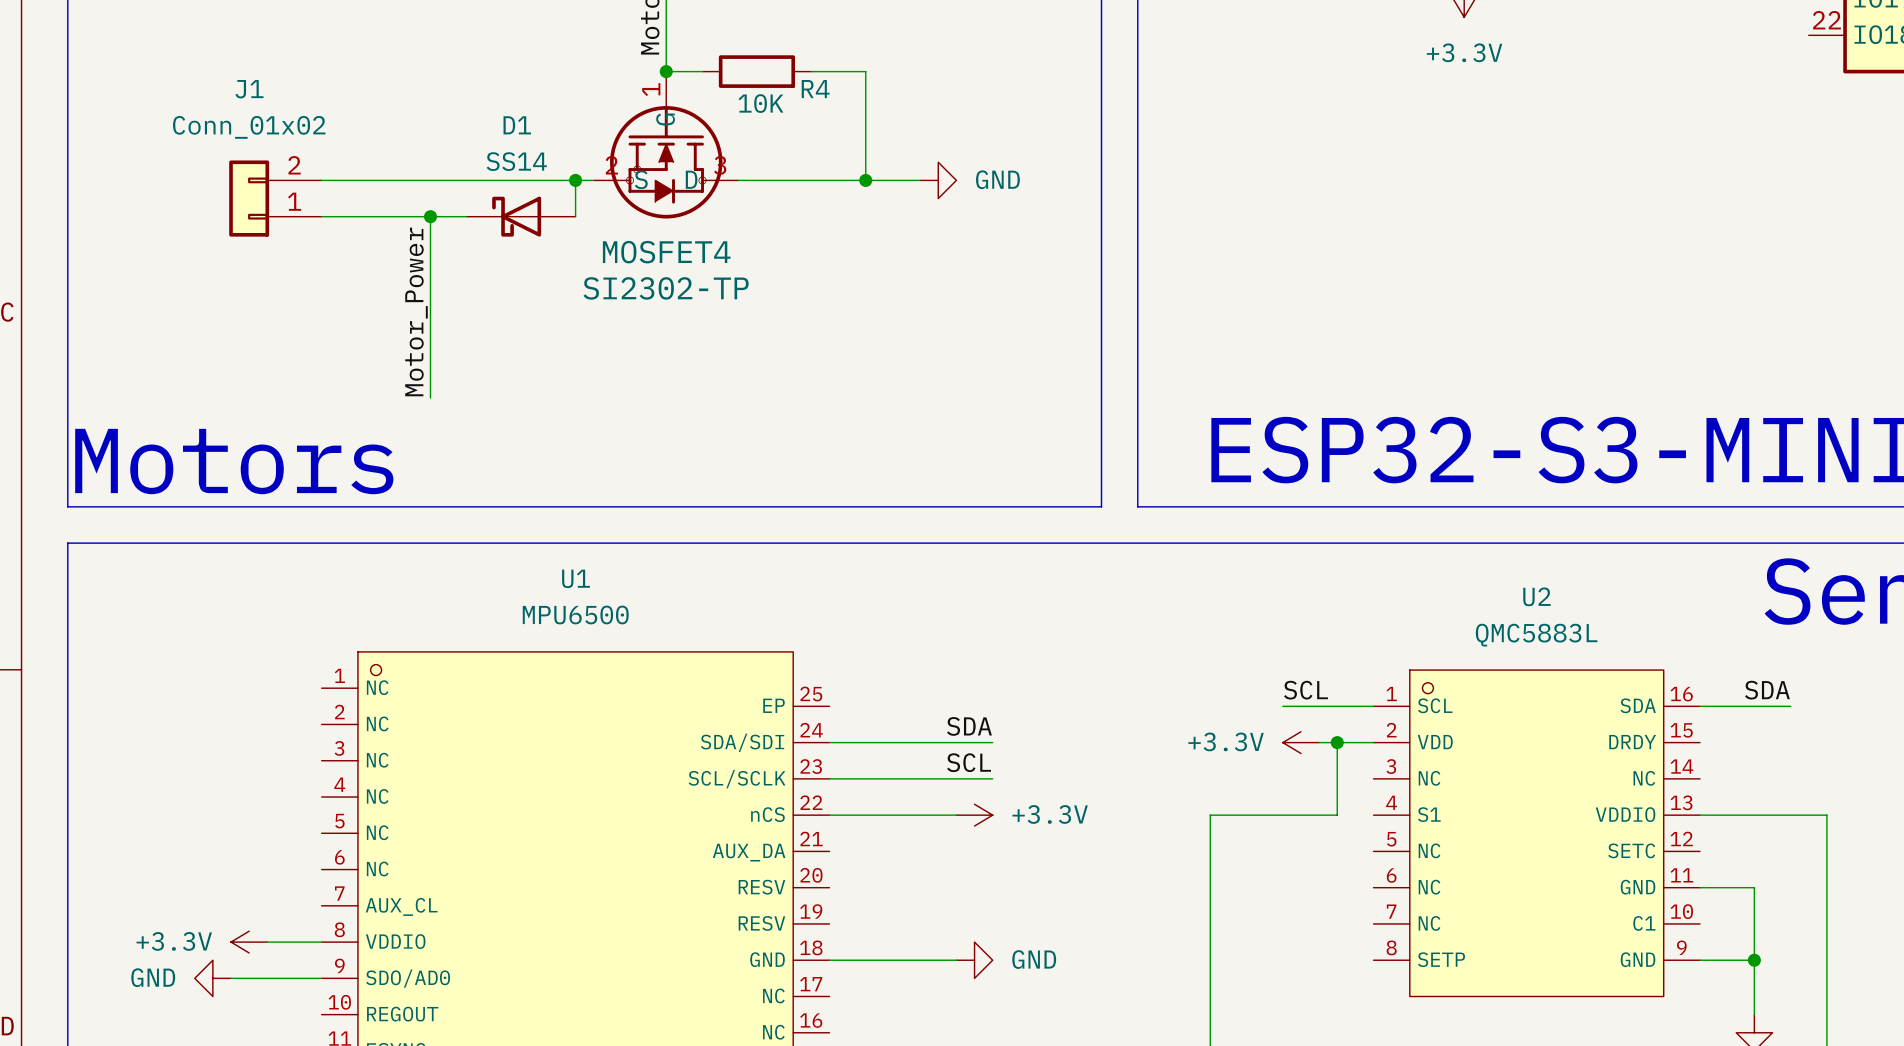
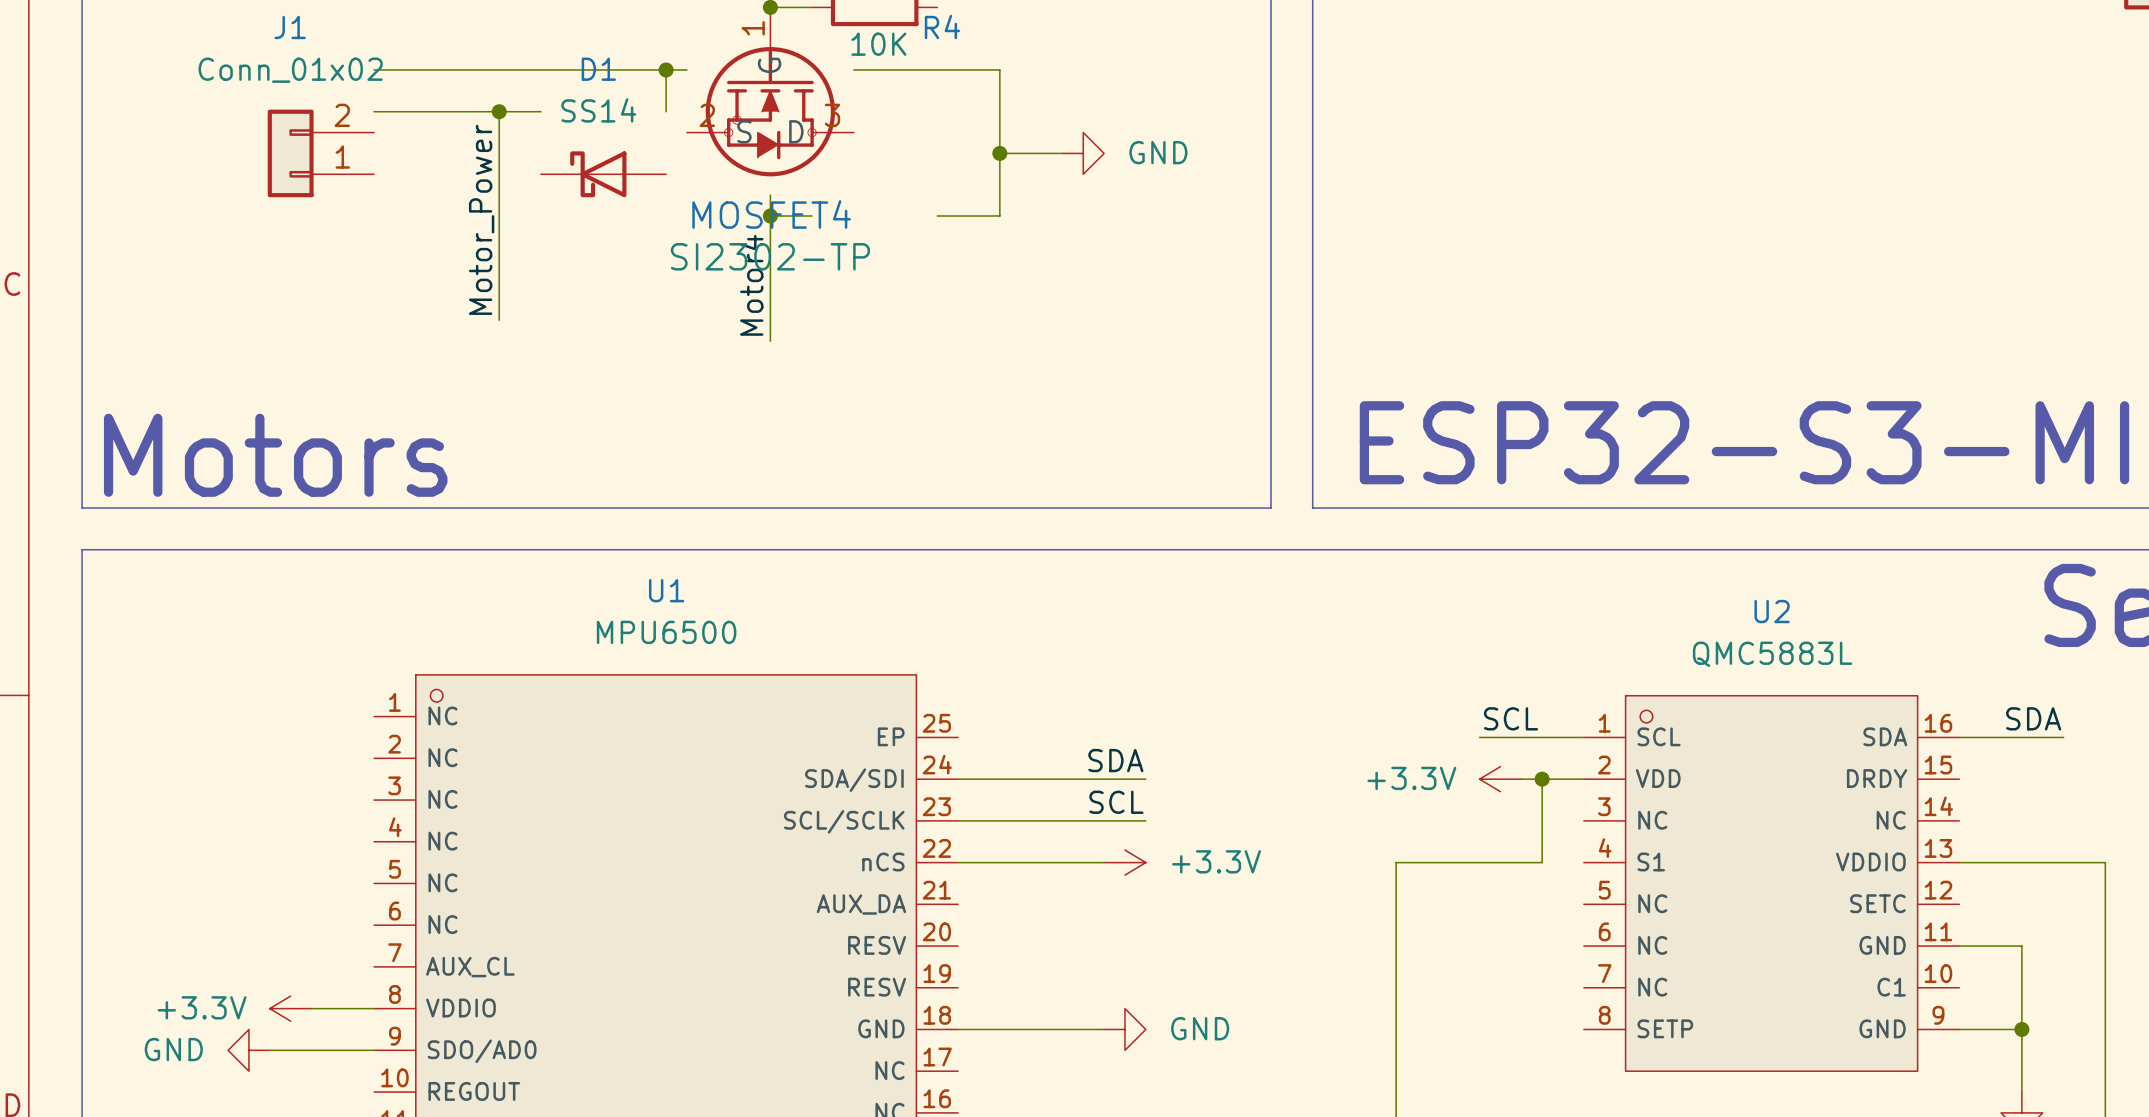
wire: (811, 71) (865, 71) (865, 126) -> (853, 69) (999, 69)
wire: (321, 180) (593, 180) -> (374, 69) (686, 69)
wire: (575, 180) (575, 216) -> (666, 69) (666, 111)
junction position: (575, 180) -> (666, 69)
wire: (738, 180) (920, 180) -> none
wire: none -> (999, 132) (999, 216) (937, 216)
junction position: (865, 180) -> (999, 153)
power symbol position: GND (938, 180) -> GND (1083, 153)
wire: none -> (999, 153) (1062, 153)
wire: (321, 216) (466, 216) -> (374, 111) (540, 111)
junction position: (430, 216) -> (499, 111)
wire: none -> (770, 195) (770, 341)
wire: none -> (770, 216) (812, 216)
junction: none -> (770, 216)
label position: Motor_Power (416, 311) -> Motor_Power (481, 219)
label: none -> Motor4 (751, 285)
wire: (430, 343) (430, 398) -> (499, 111) (499, 174)

